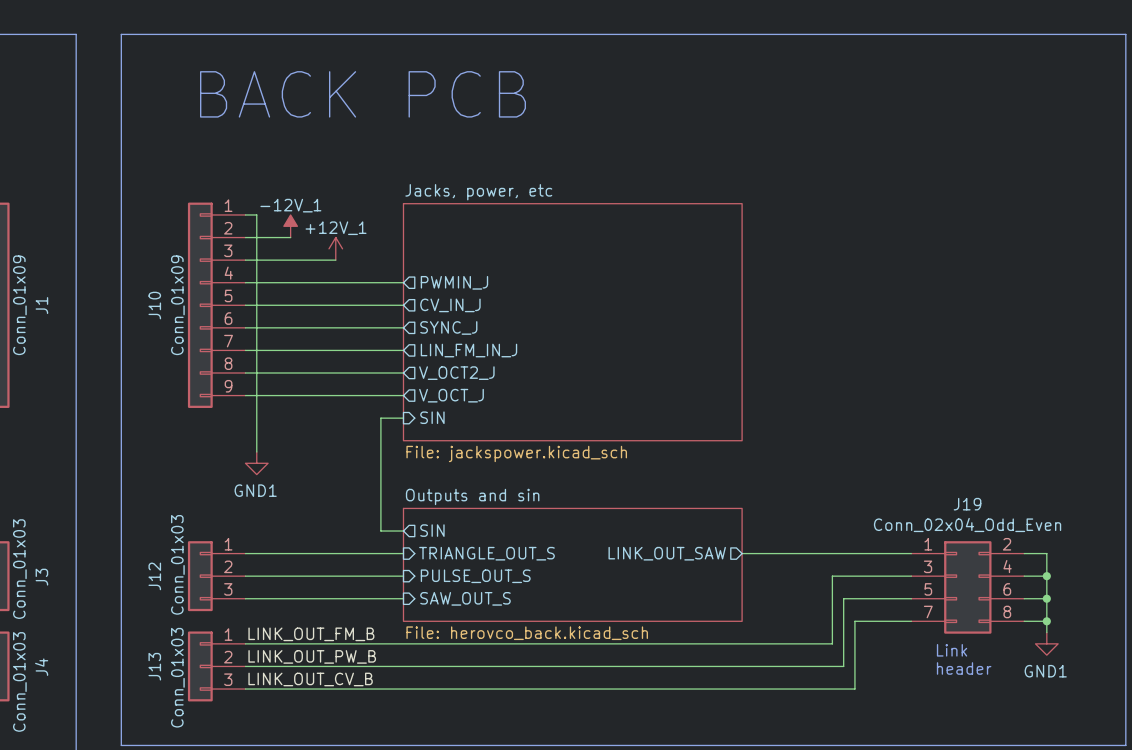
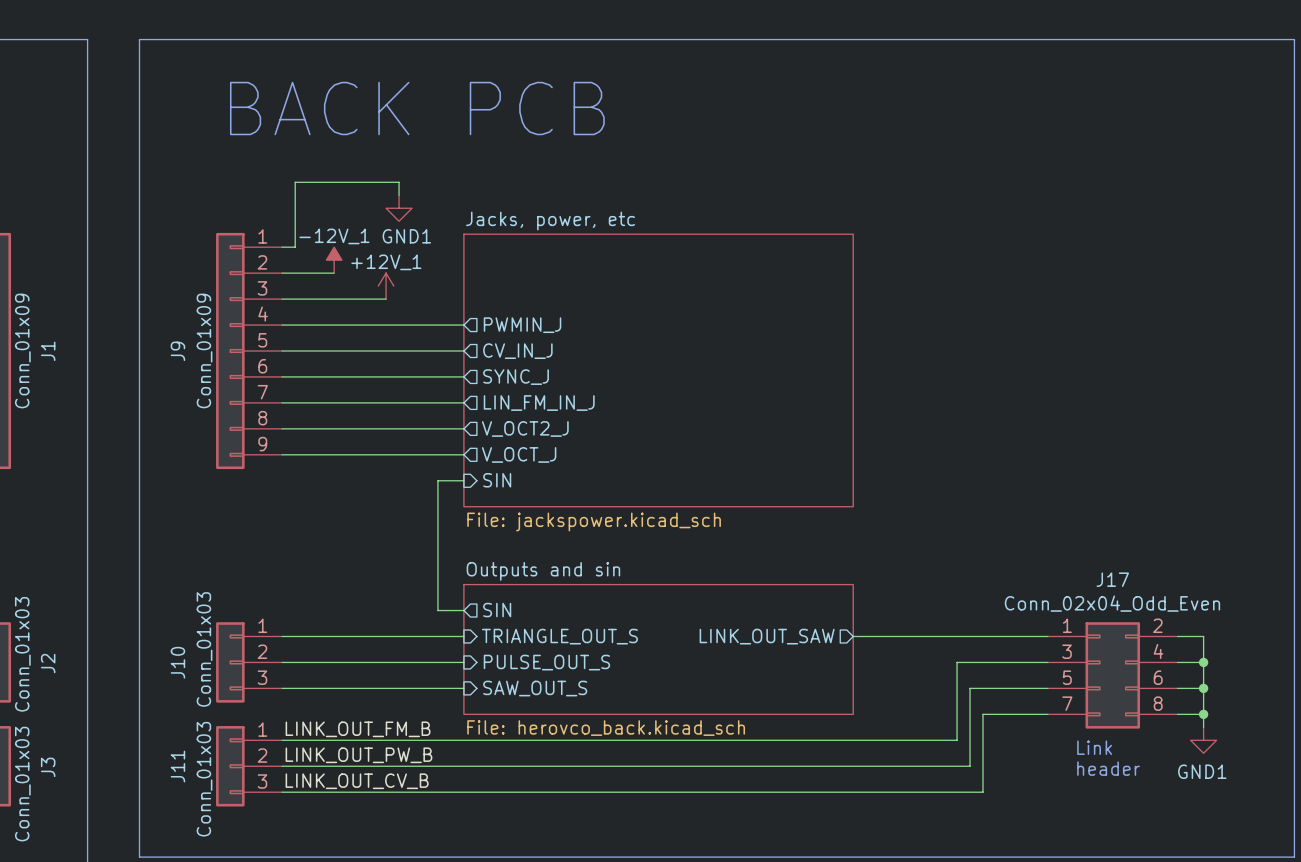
power symbol: none -> GND1 (399, 208)
wire: (256, 214) (256, 452) -> (295, 247) (295, 182) (399, 182) (399, 195)
J10 name: J10 (154, 305) -> J9 (177, 351)
power symbol: GND1 (256, 463) -> none
J19 name: J19 (967, 504) -> J17 (1112, 579)
J12 name: J12 (154, 576) -> J10 (177, 662)
J3 name: J3 (41, 577) -> J2 (48, 663)
J13 name: J13 (154, 666) -> J11 (177, 766)
J4 name: J4 (41, 667) -> J3 (48, 767)

